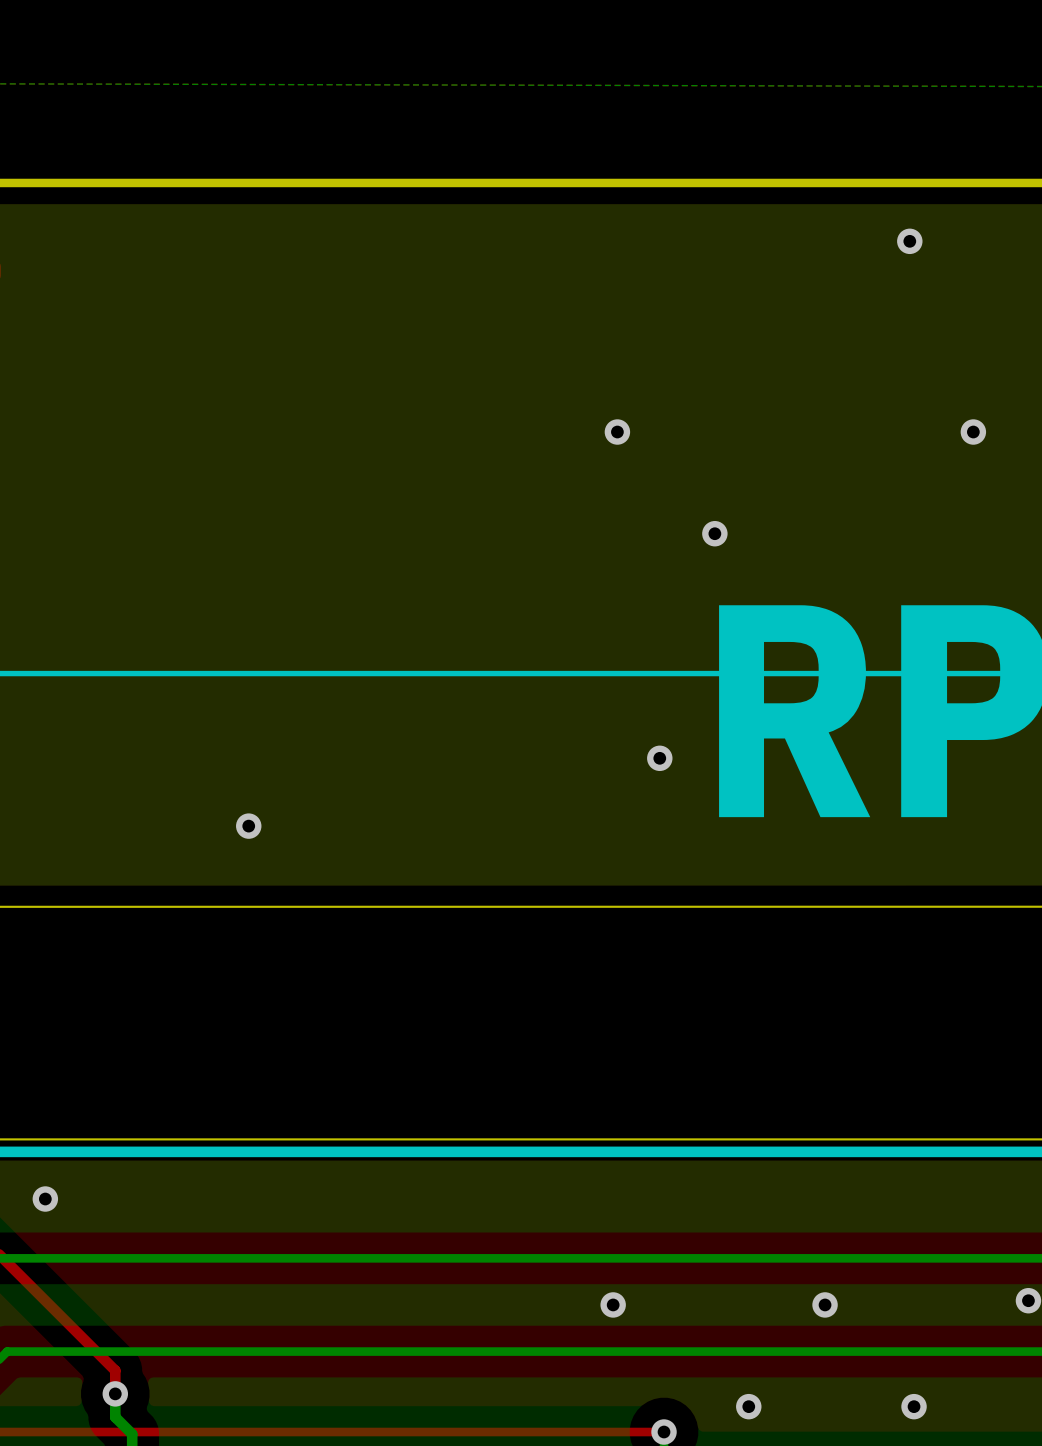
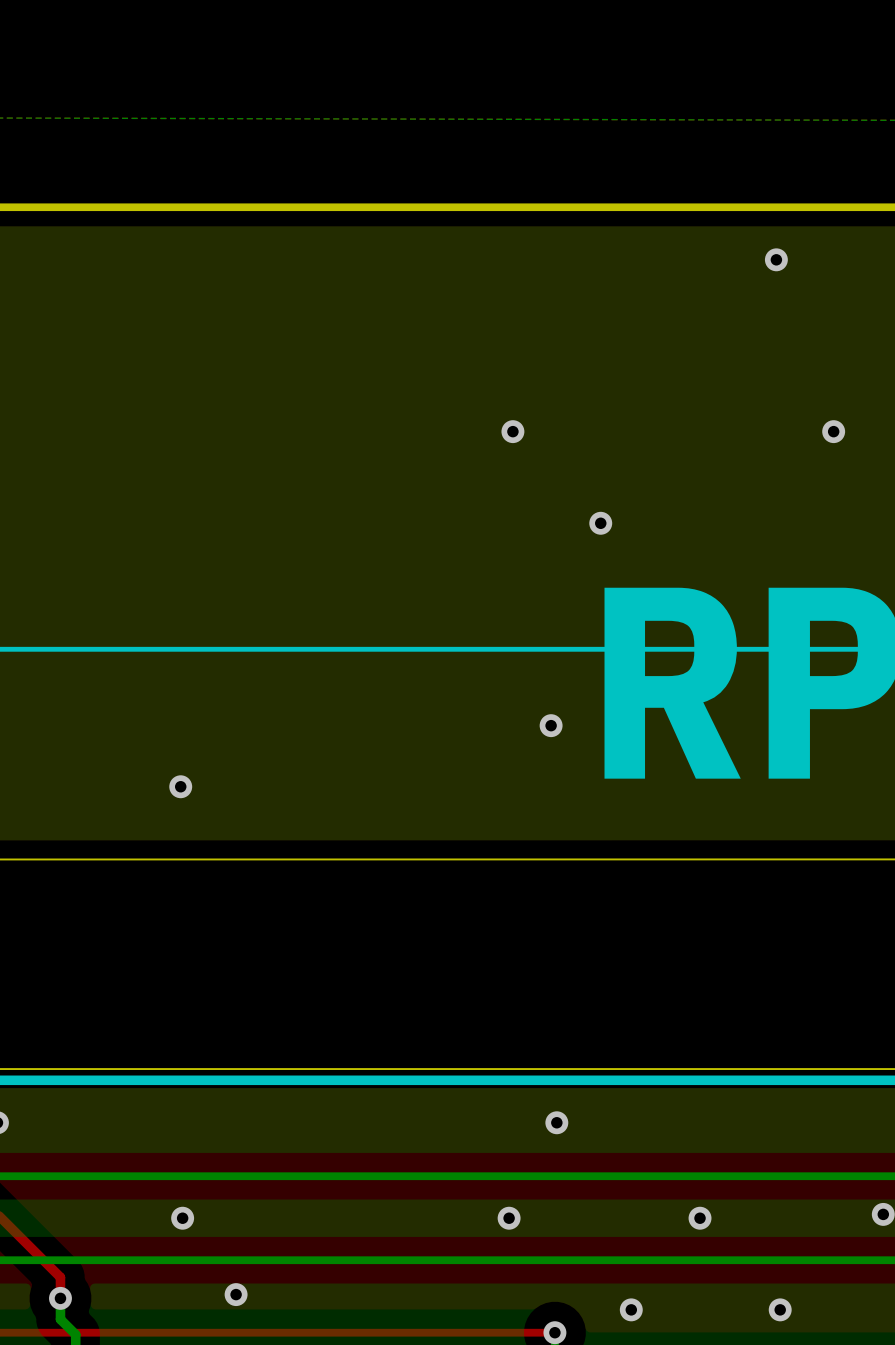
via: none -> (556, 1122)
via: none -> (182, 1218)
via: none -> (236, 1294)

